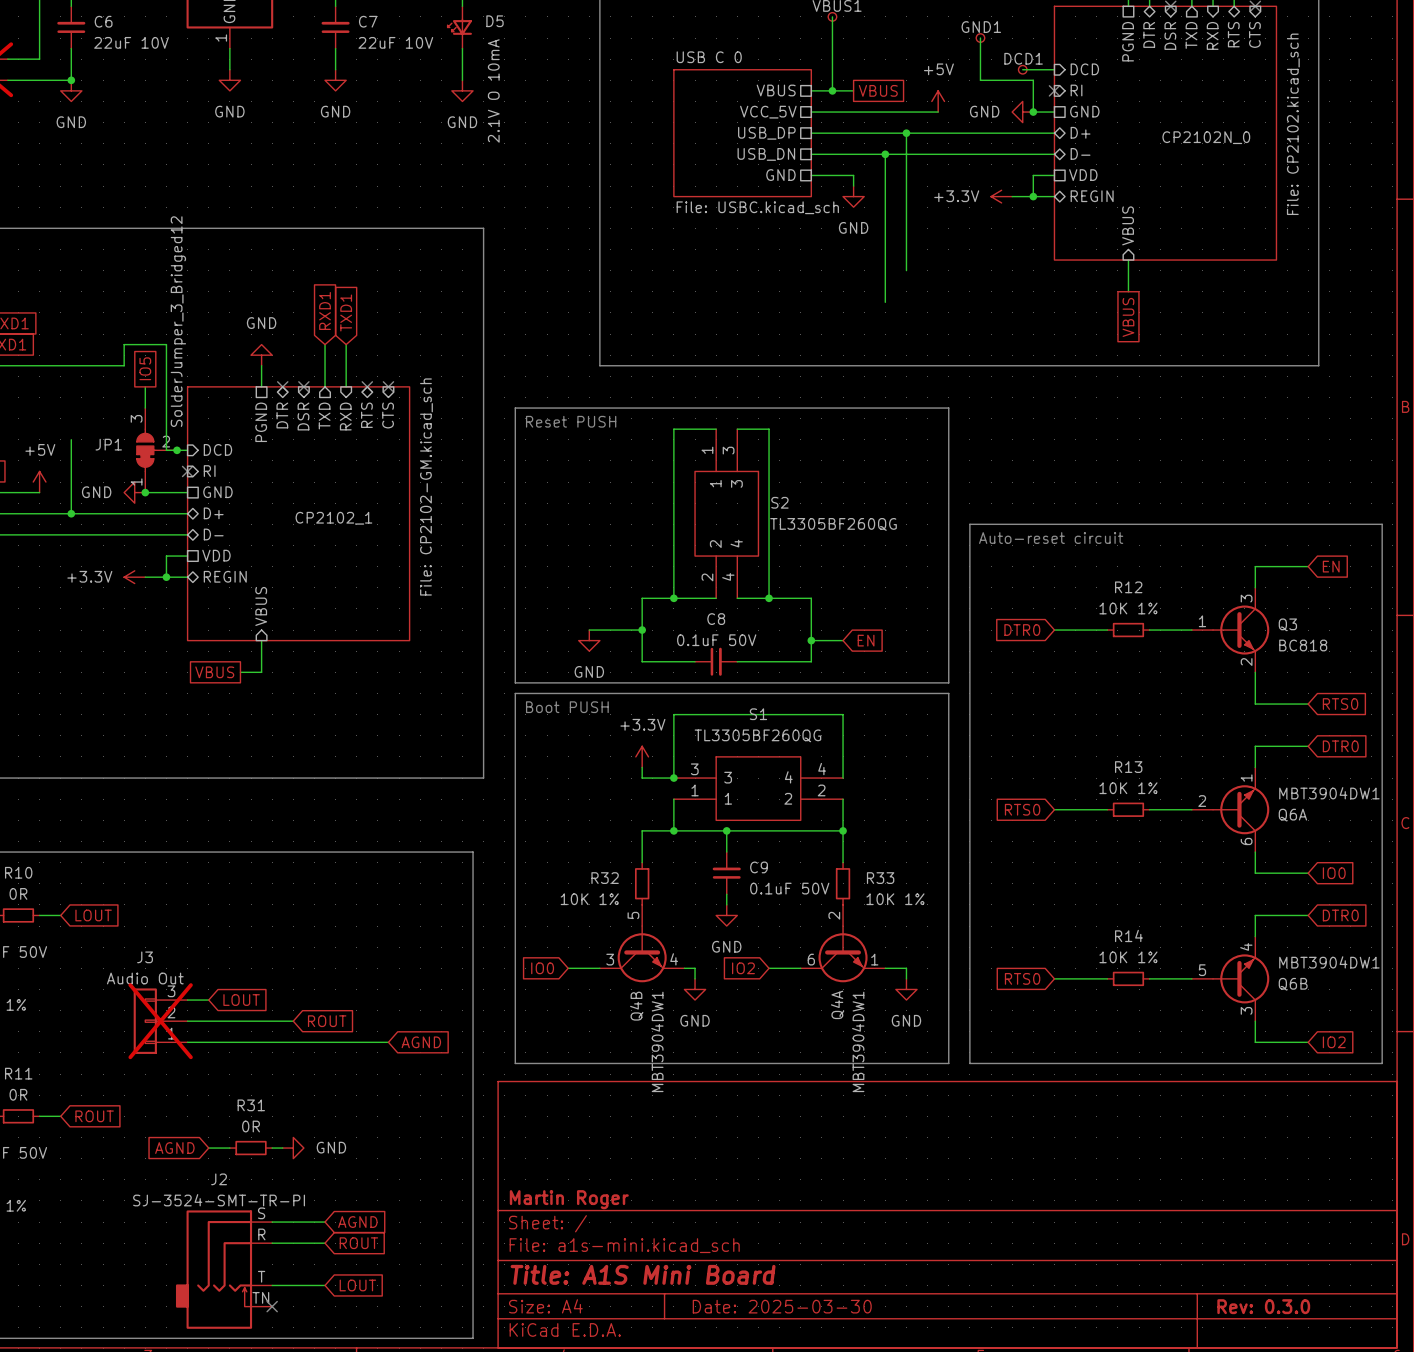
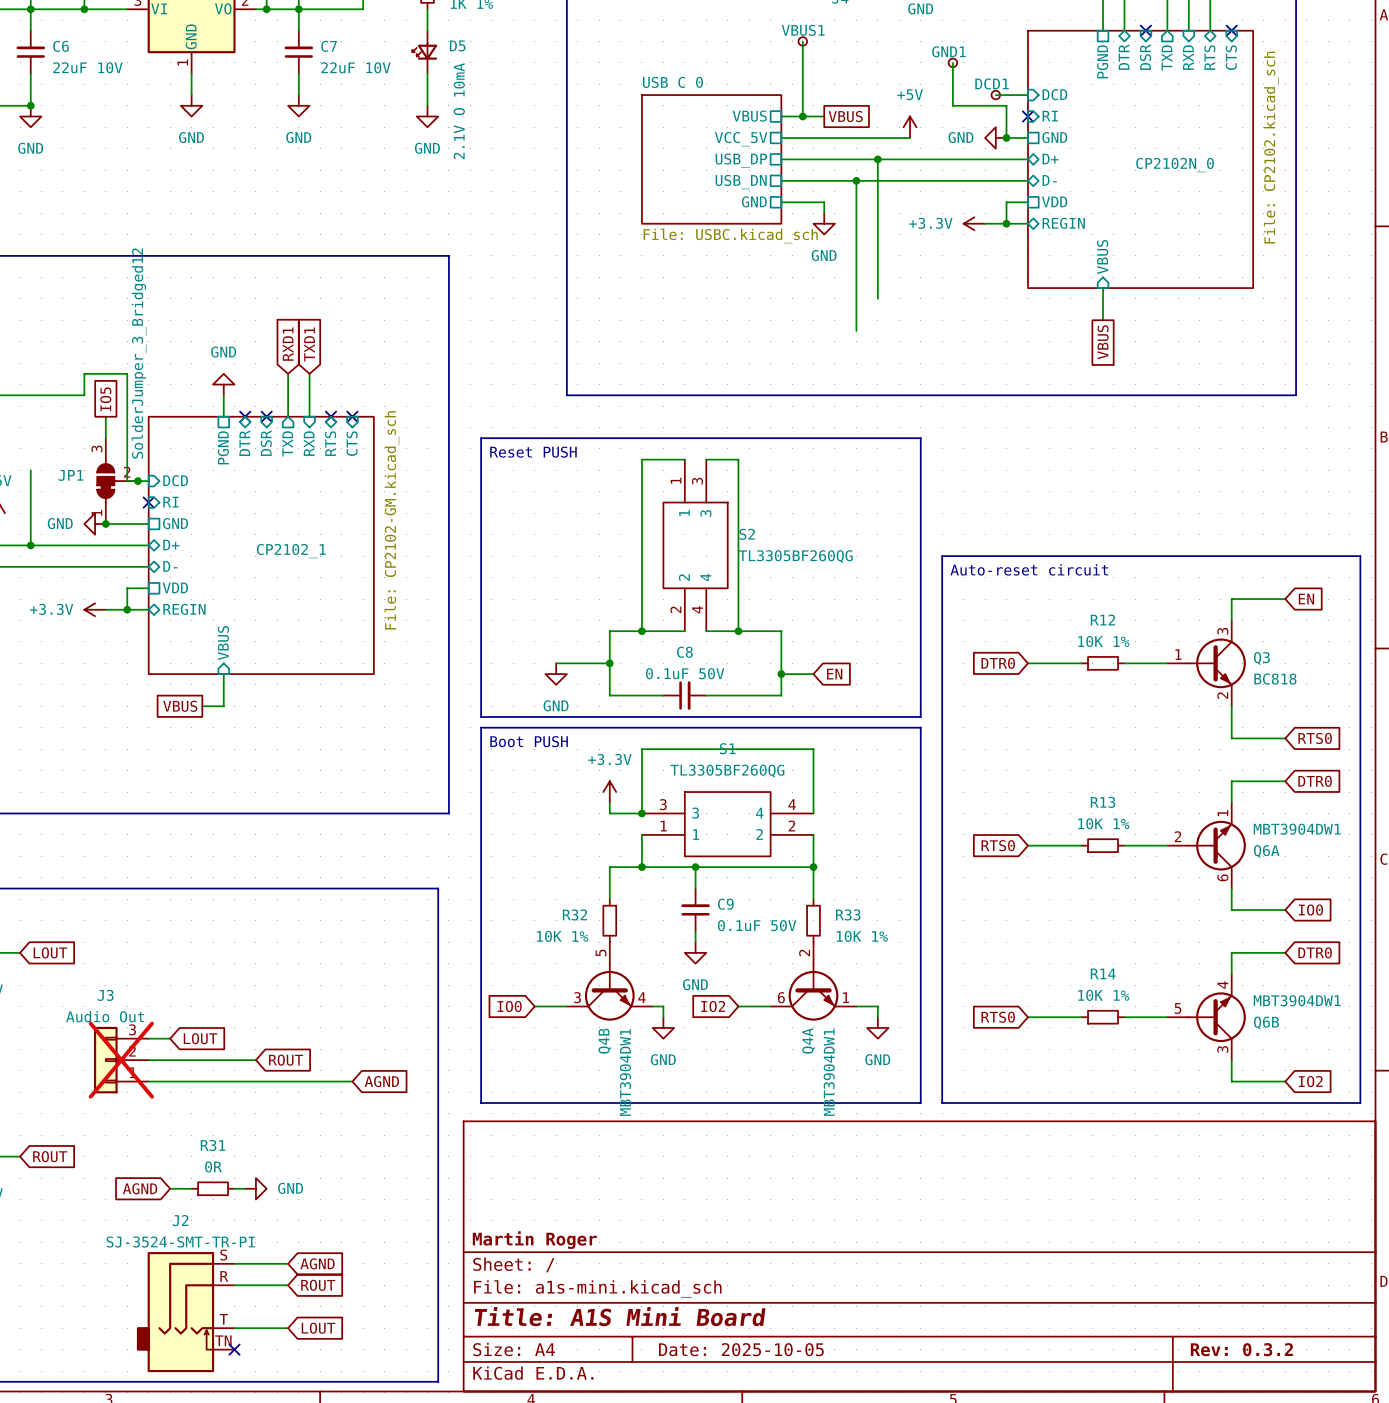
title block: Date: 2025-03-30 (782, 1306) -> Date: 2025-10-05 (741, 1349)
title block: Rev: 0.3.0 (1263, 1306) -> Rev: 0.3.2 (1241, 1349)

